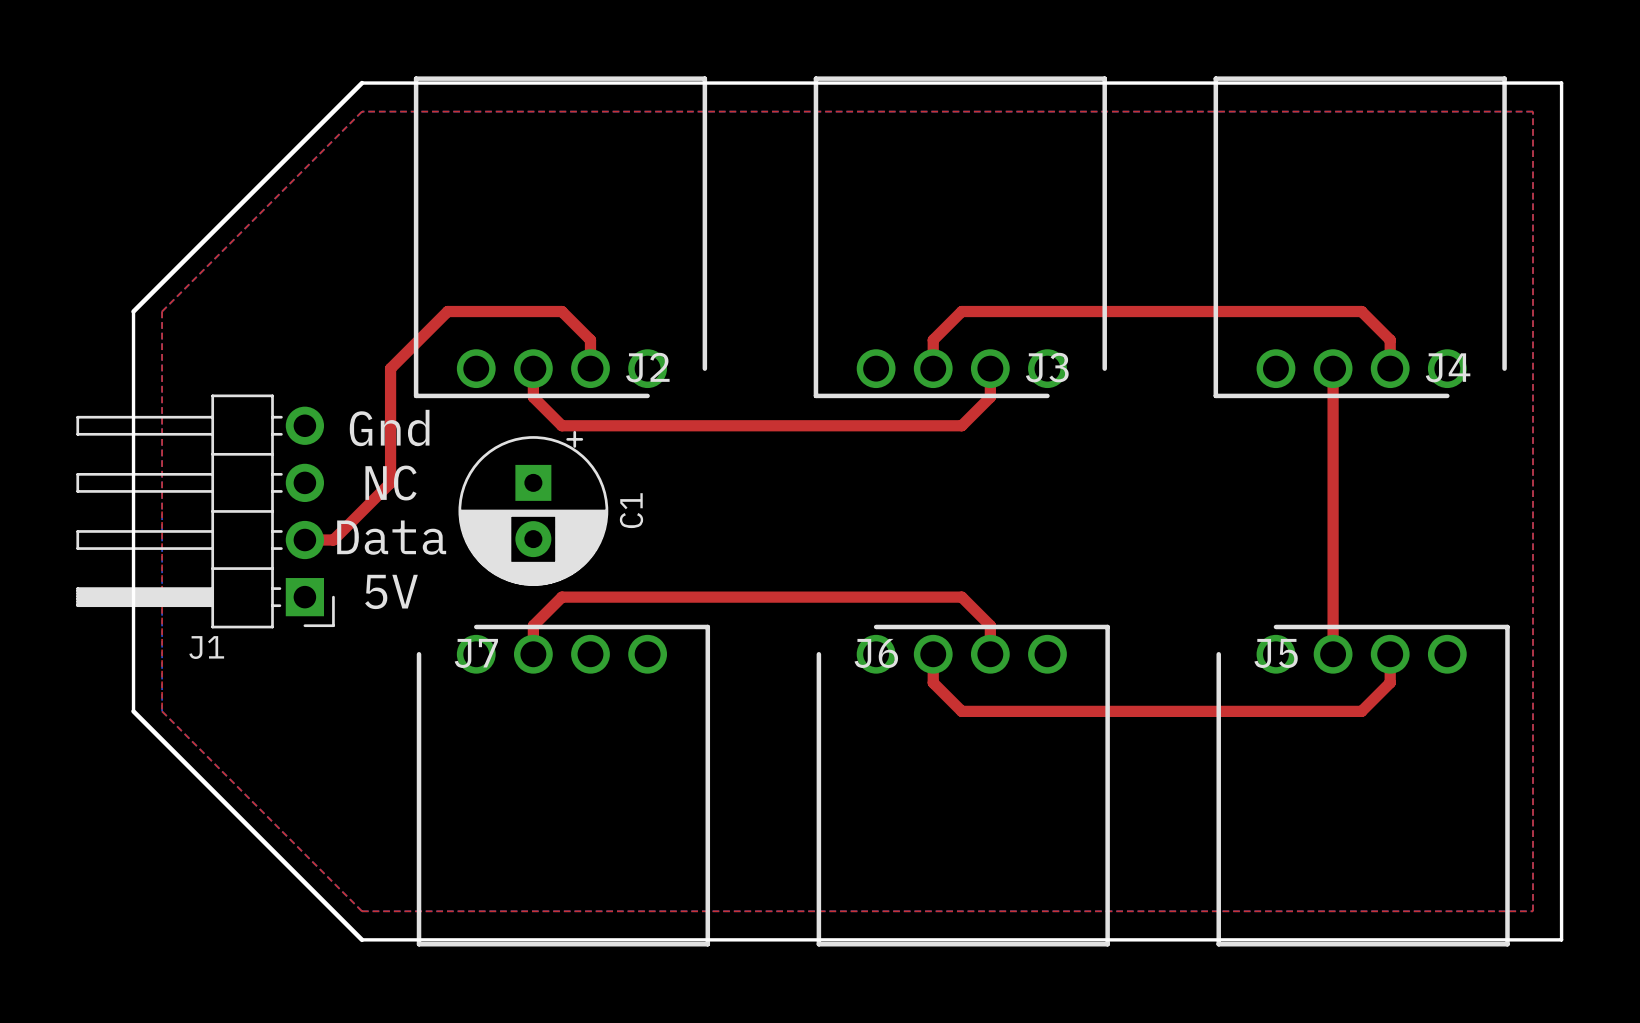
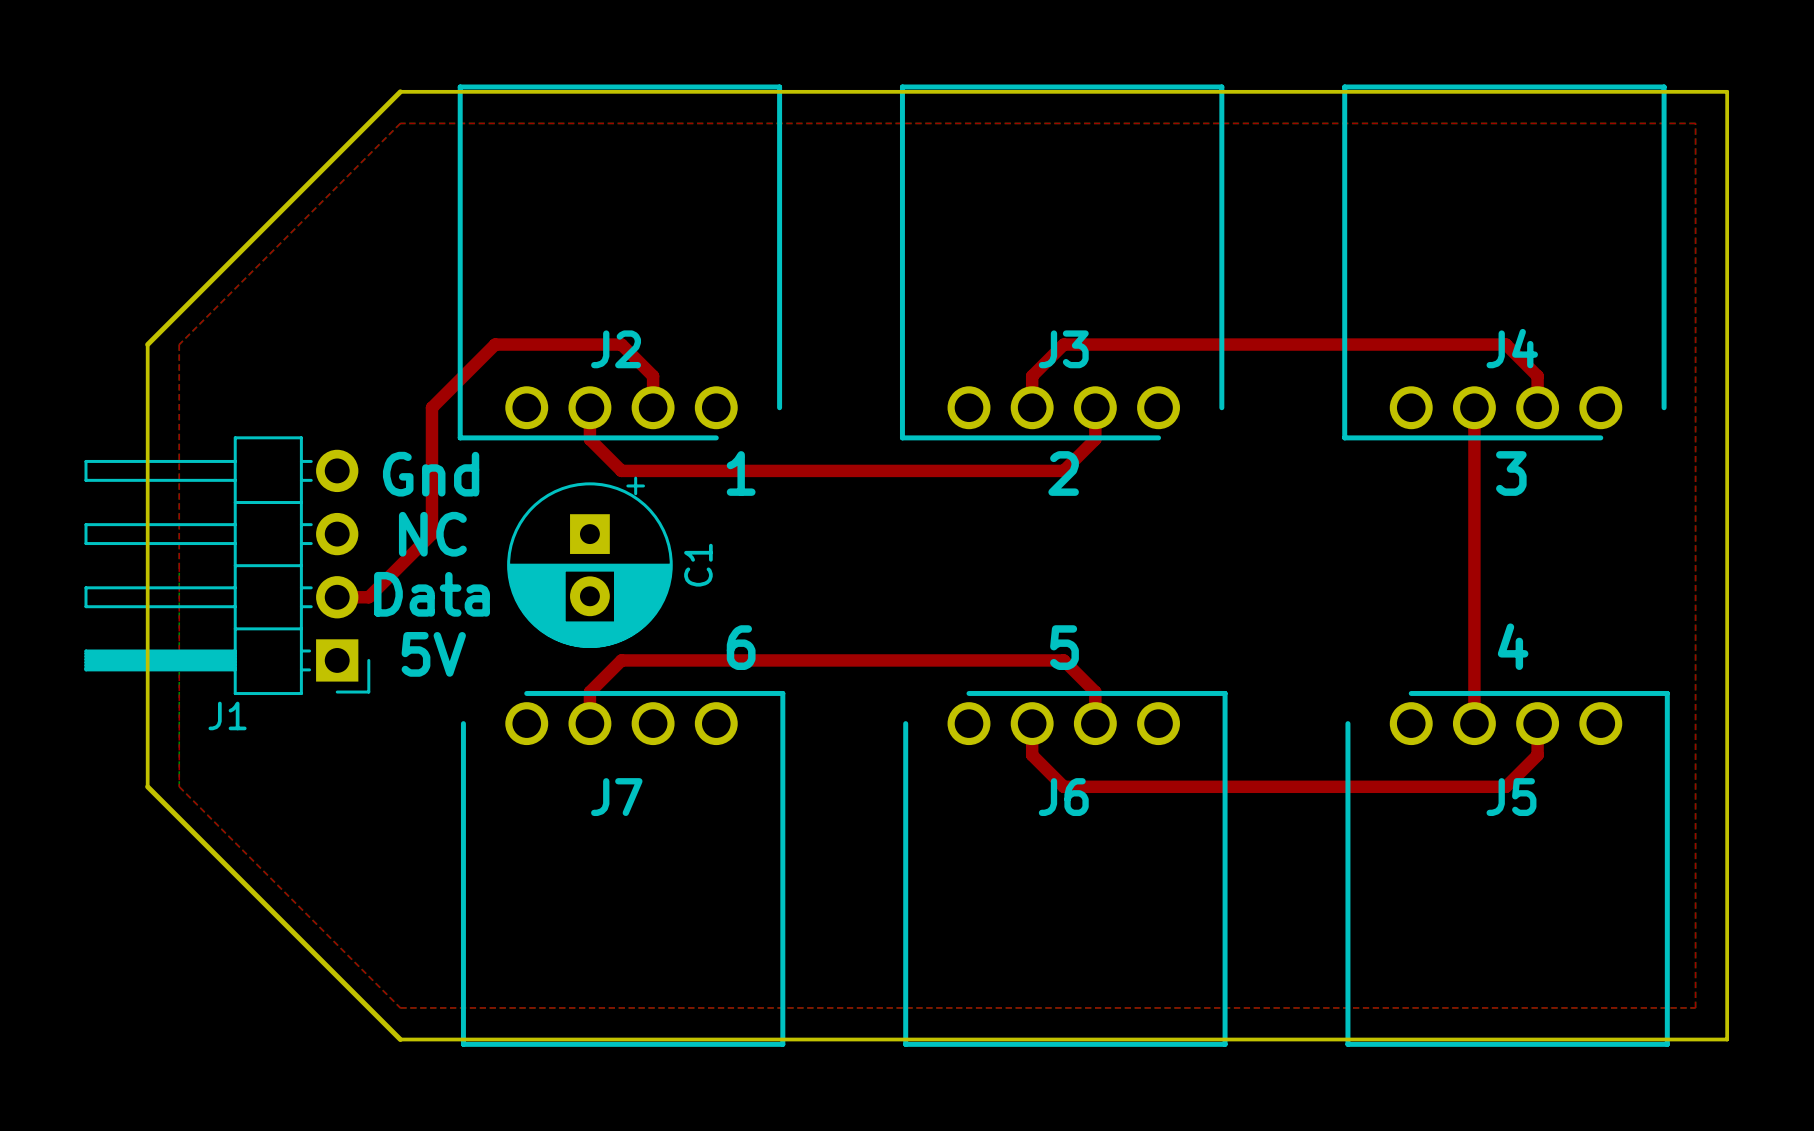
J2 name position: J2 (647, 367) -> J2 (616, 349)
J3 name position: J3 (1047, 367) -> J3 (1063, 349)
J4 name position: J4 (1448, 367) -> J4 (1512, 348)
text: none -> 2 (1063, 473)
text: none -> 1 (741, 473)
text: none -> 3 (1511, 473)
text: none -> 6 (741, 647)
text: none -> 5 (1064, 647)
text: none -> 4 (1513, 646)
J7 name position: J7 (476, 653) -> J7 (616, 797)
J6 name position: J6 (876, 653) -> J6 (1063, 797)
J5 name position: J5 (1276, 653) -> J5 (1511, 797)

